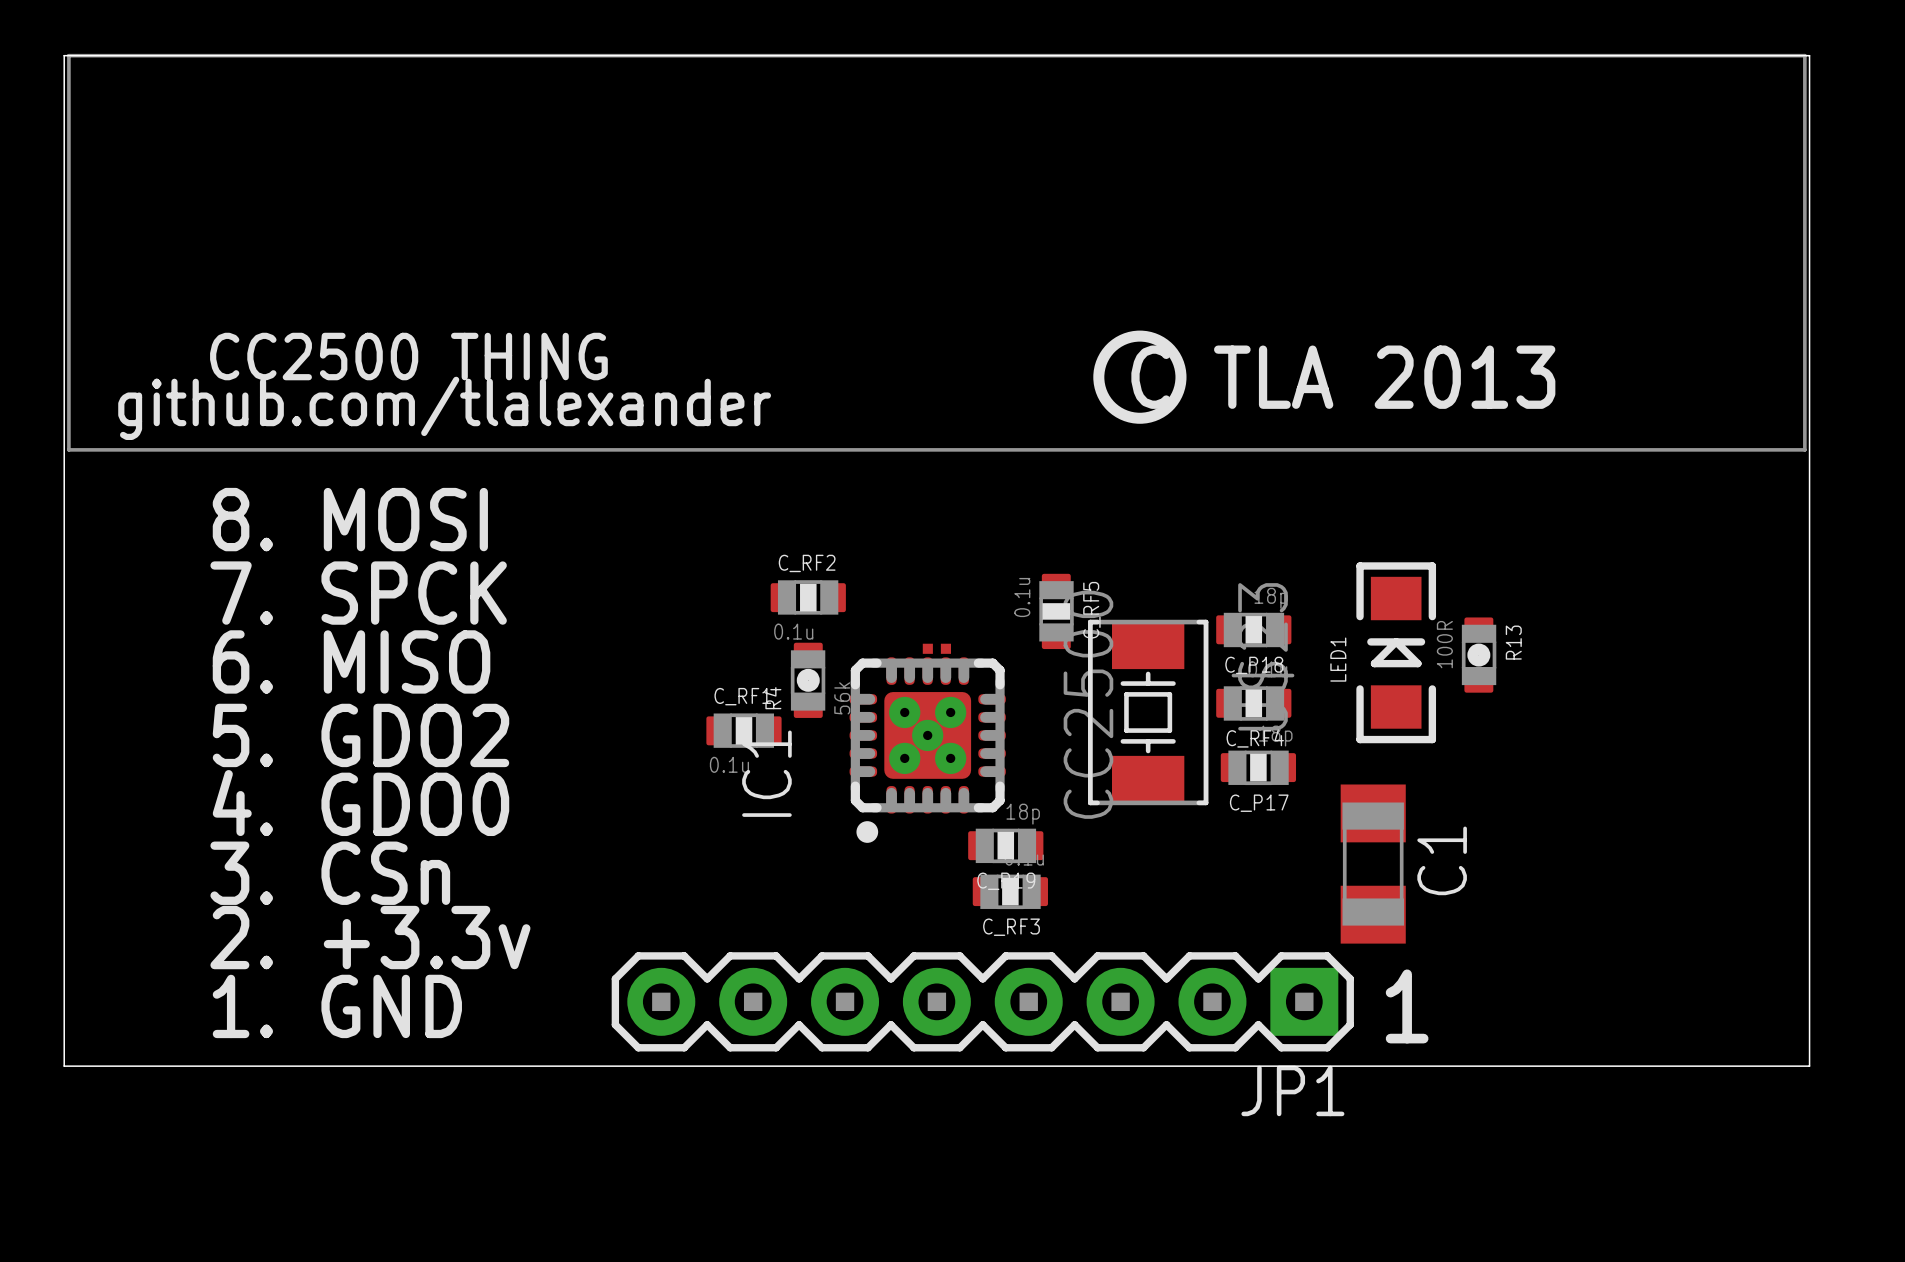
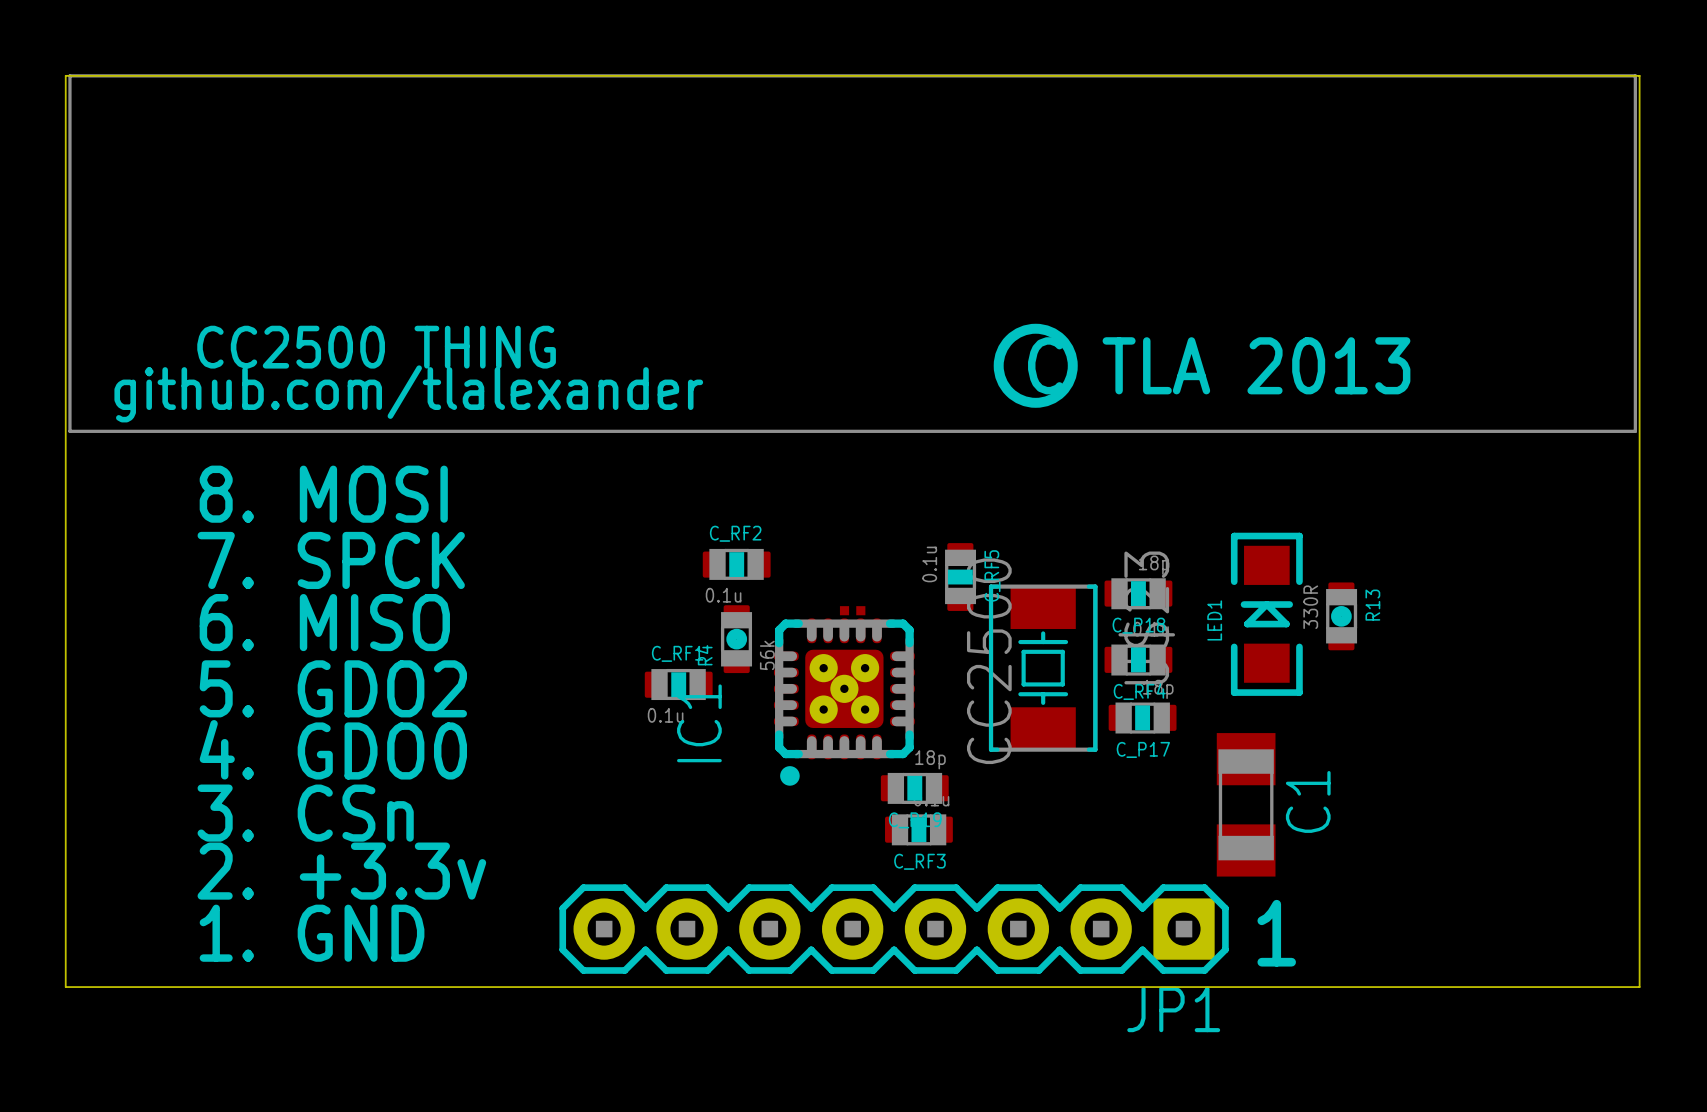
R13 value: 100R (1444, 644) -> 330R (1310, 607)

